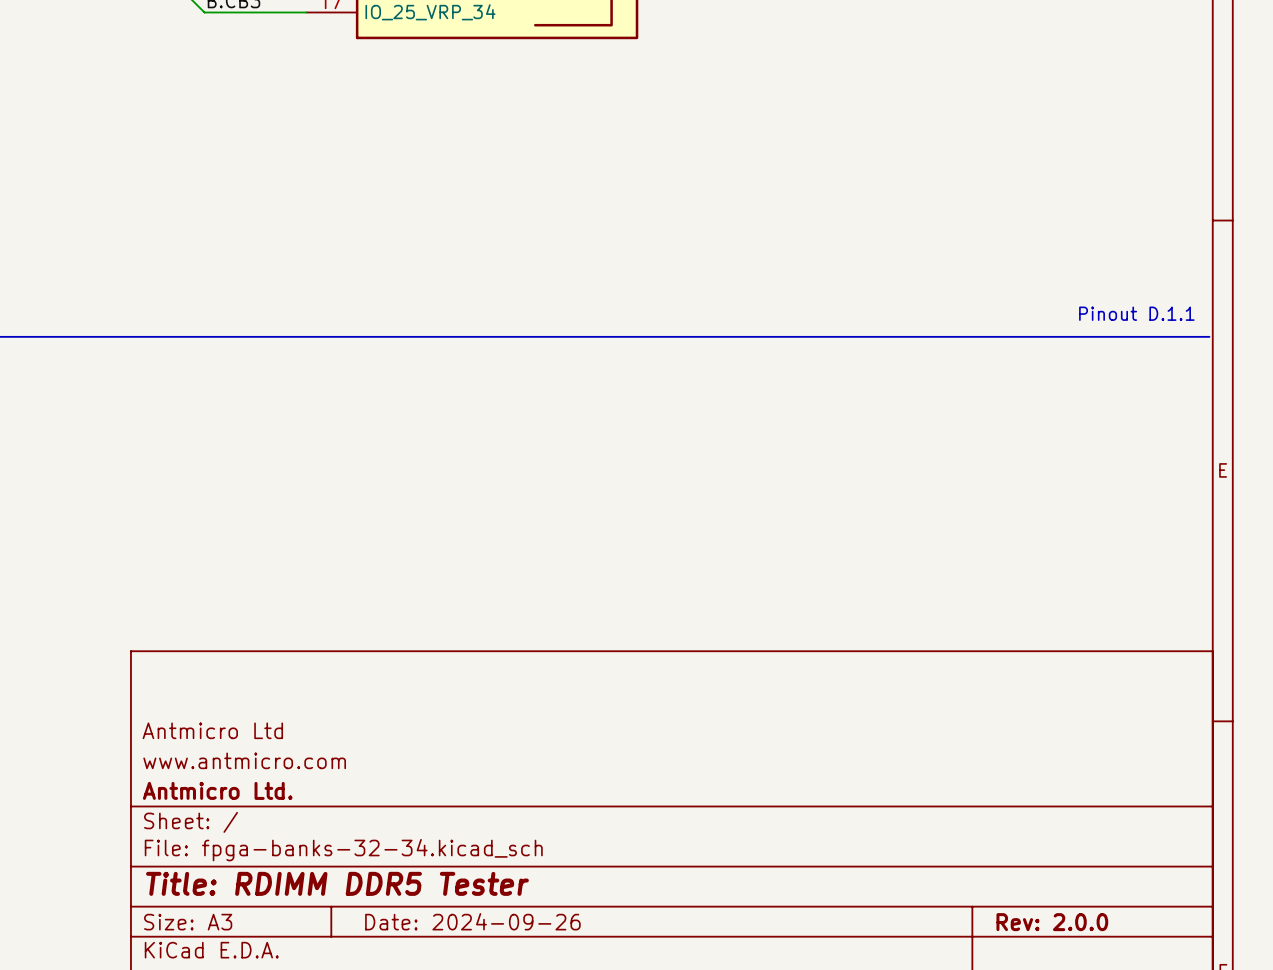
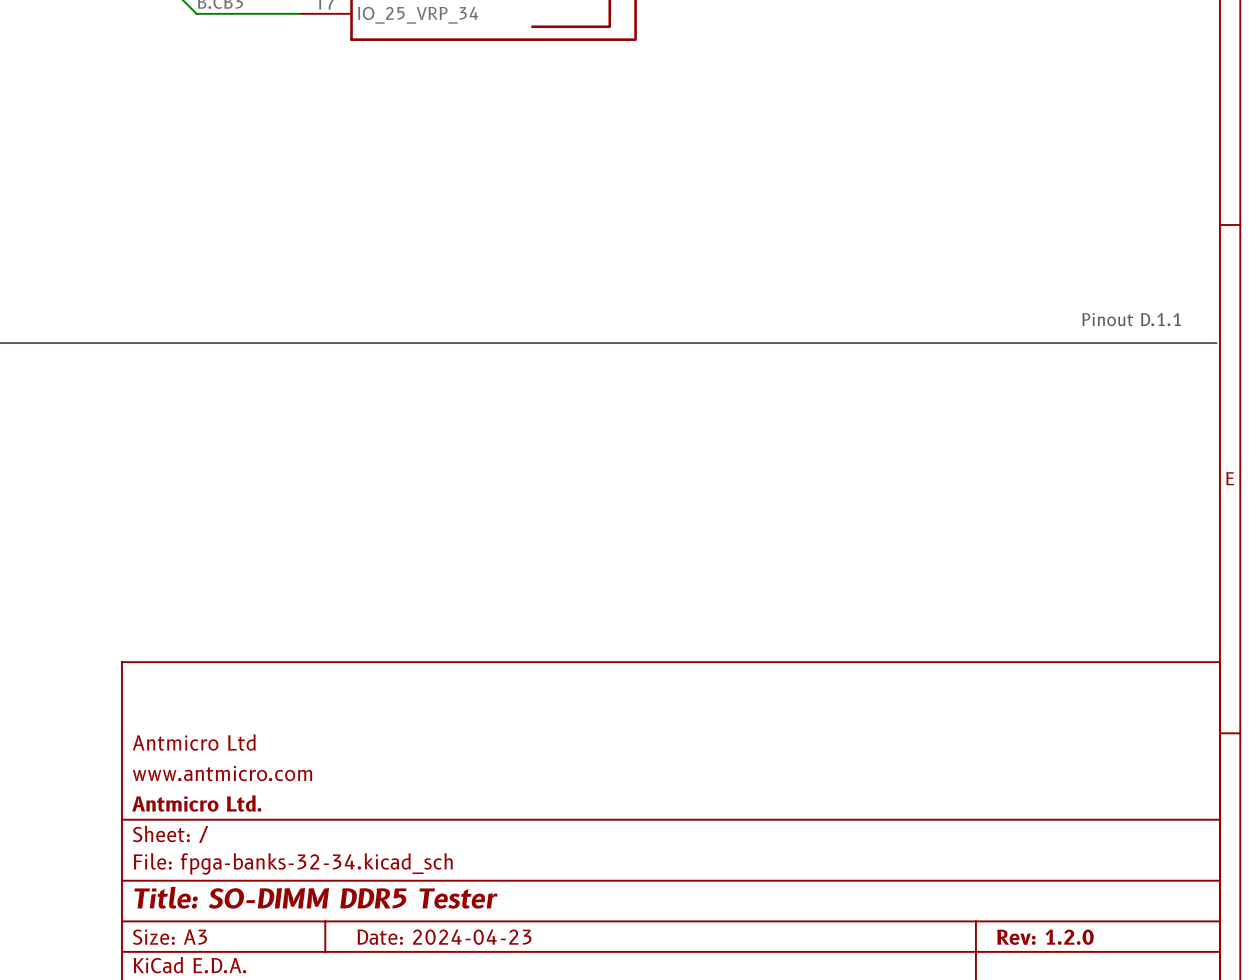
title block: Title: RDIMM DDR5 Tester (337, 883) -> Title: SO-DIMM DDR5 Tester (315, 897)
title block: Date: 2024-09-26 (472, 921) -> Date: 2024-04-23 (444, 937)
title block: Rev: 2.0.0 (1052, 922) -> Rev: 1.2.0 (1045, 937)

